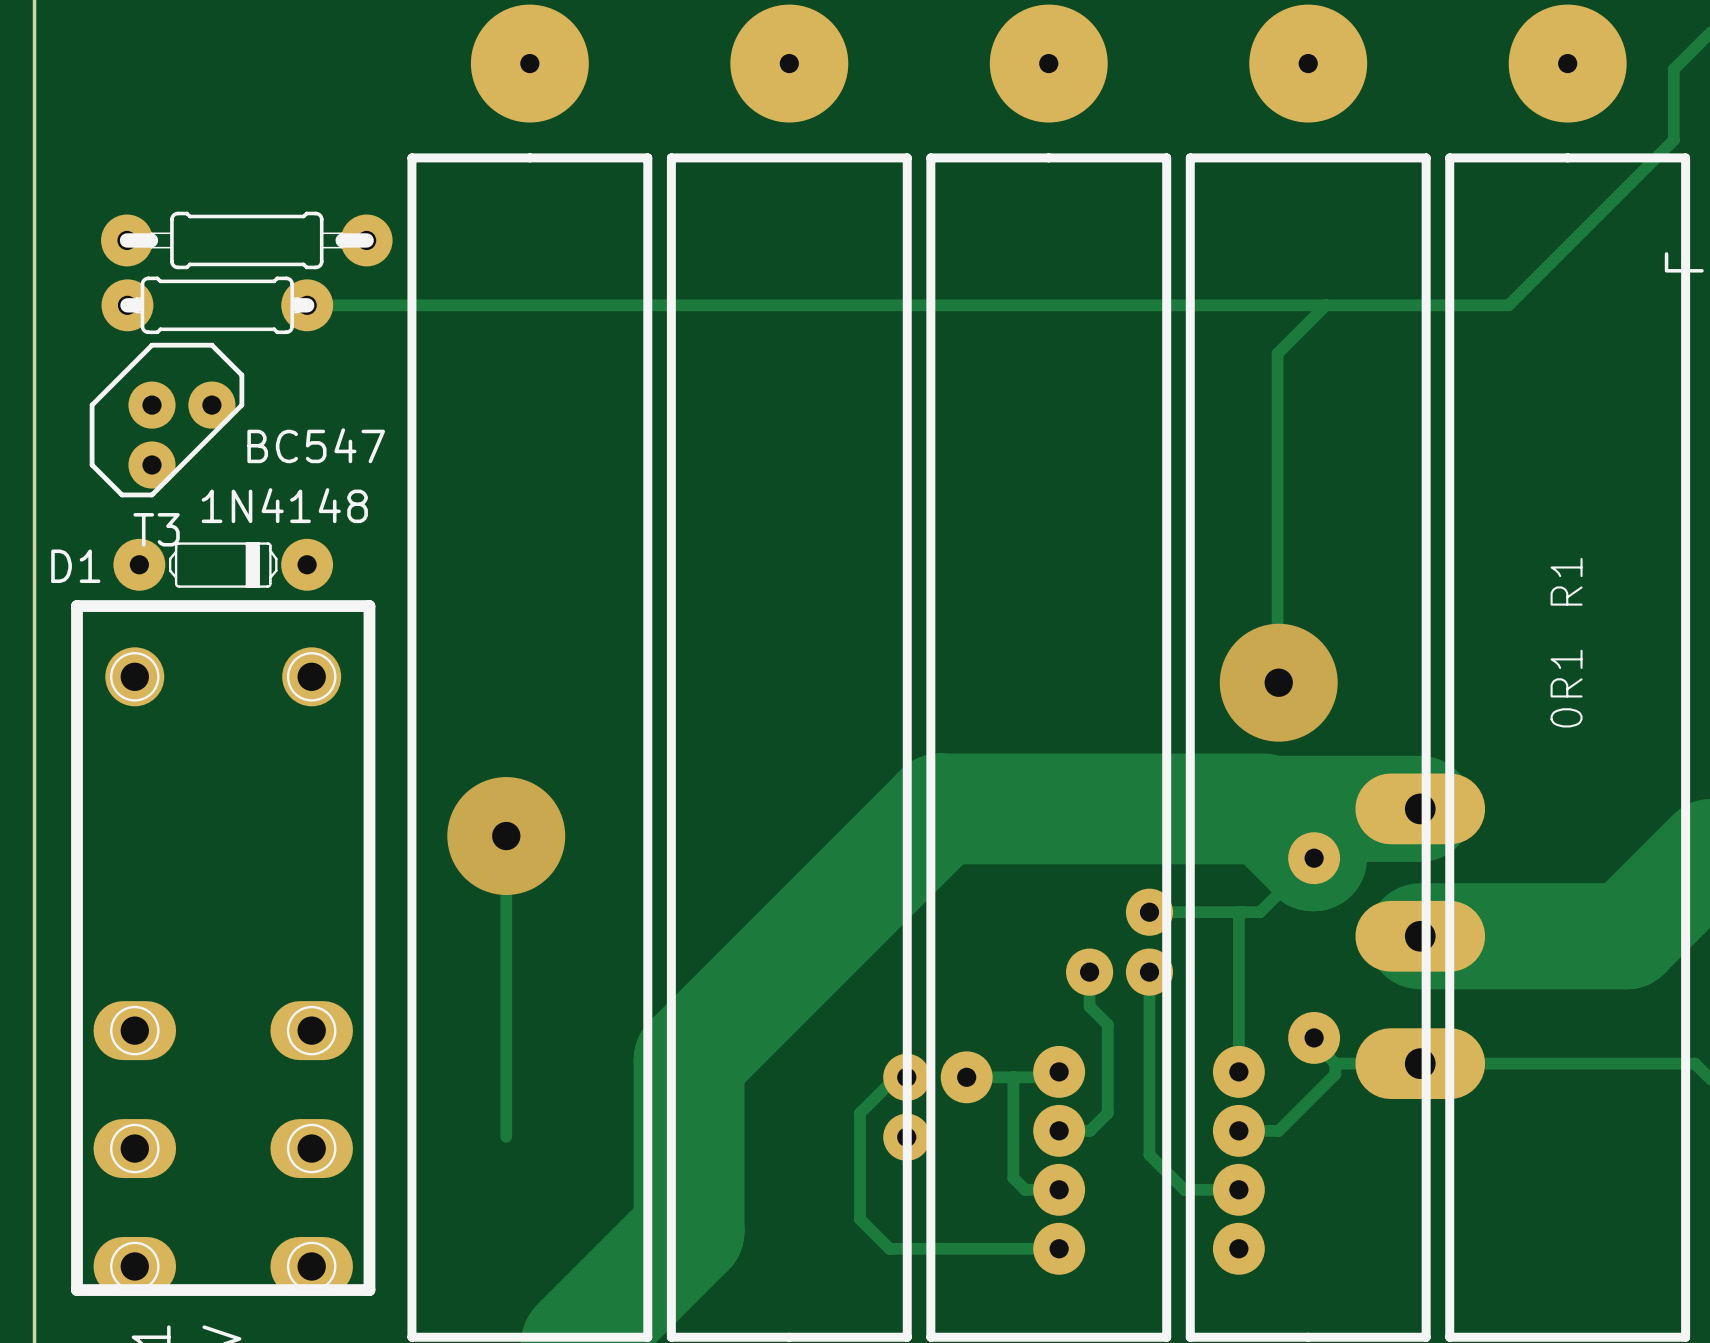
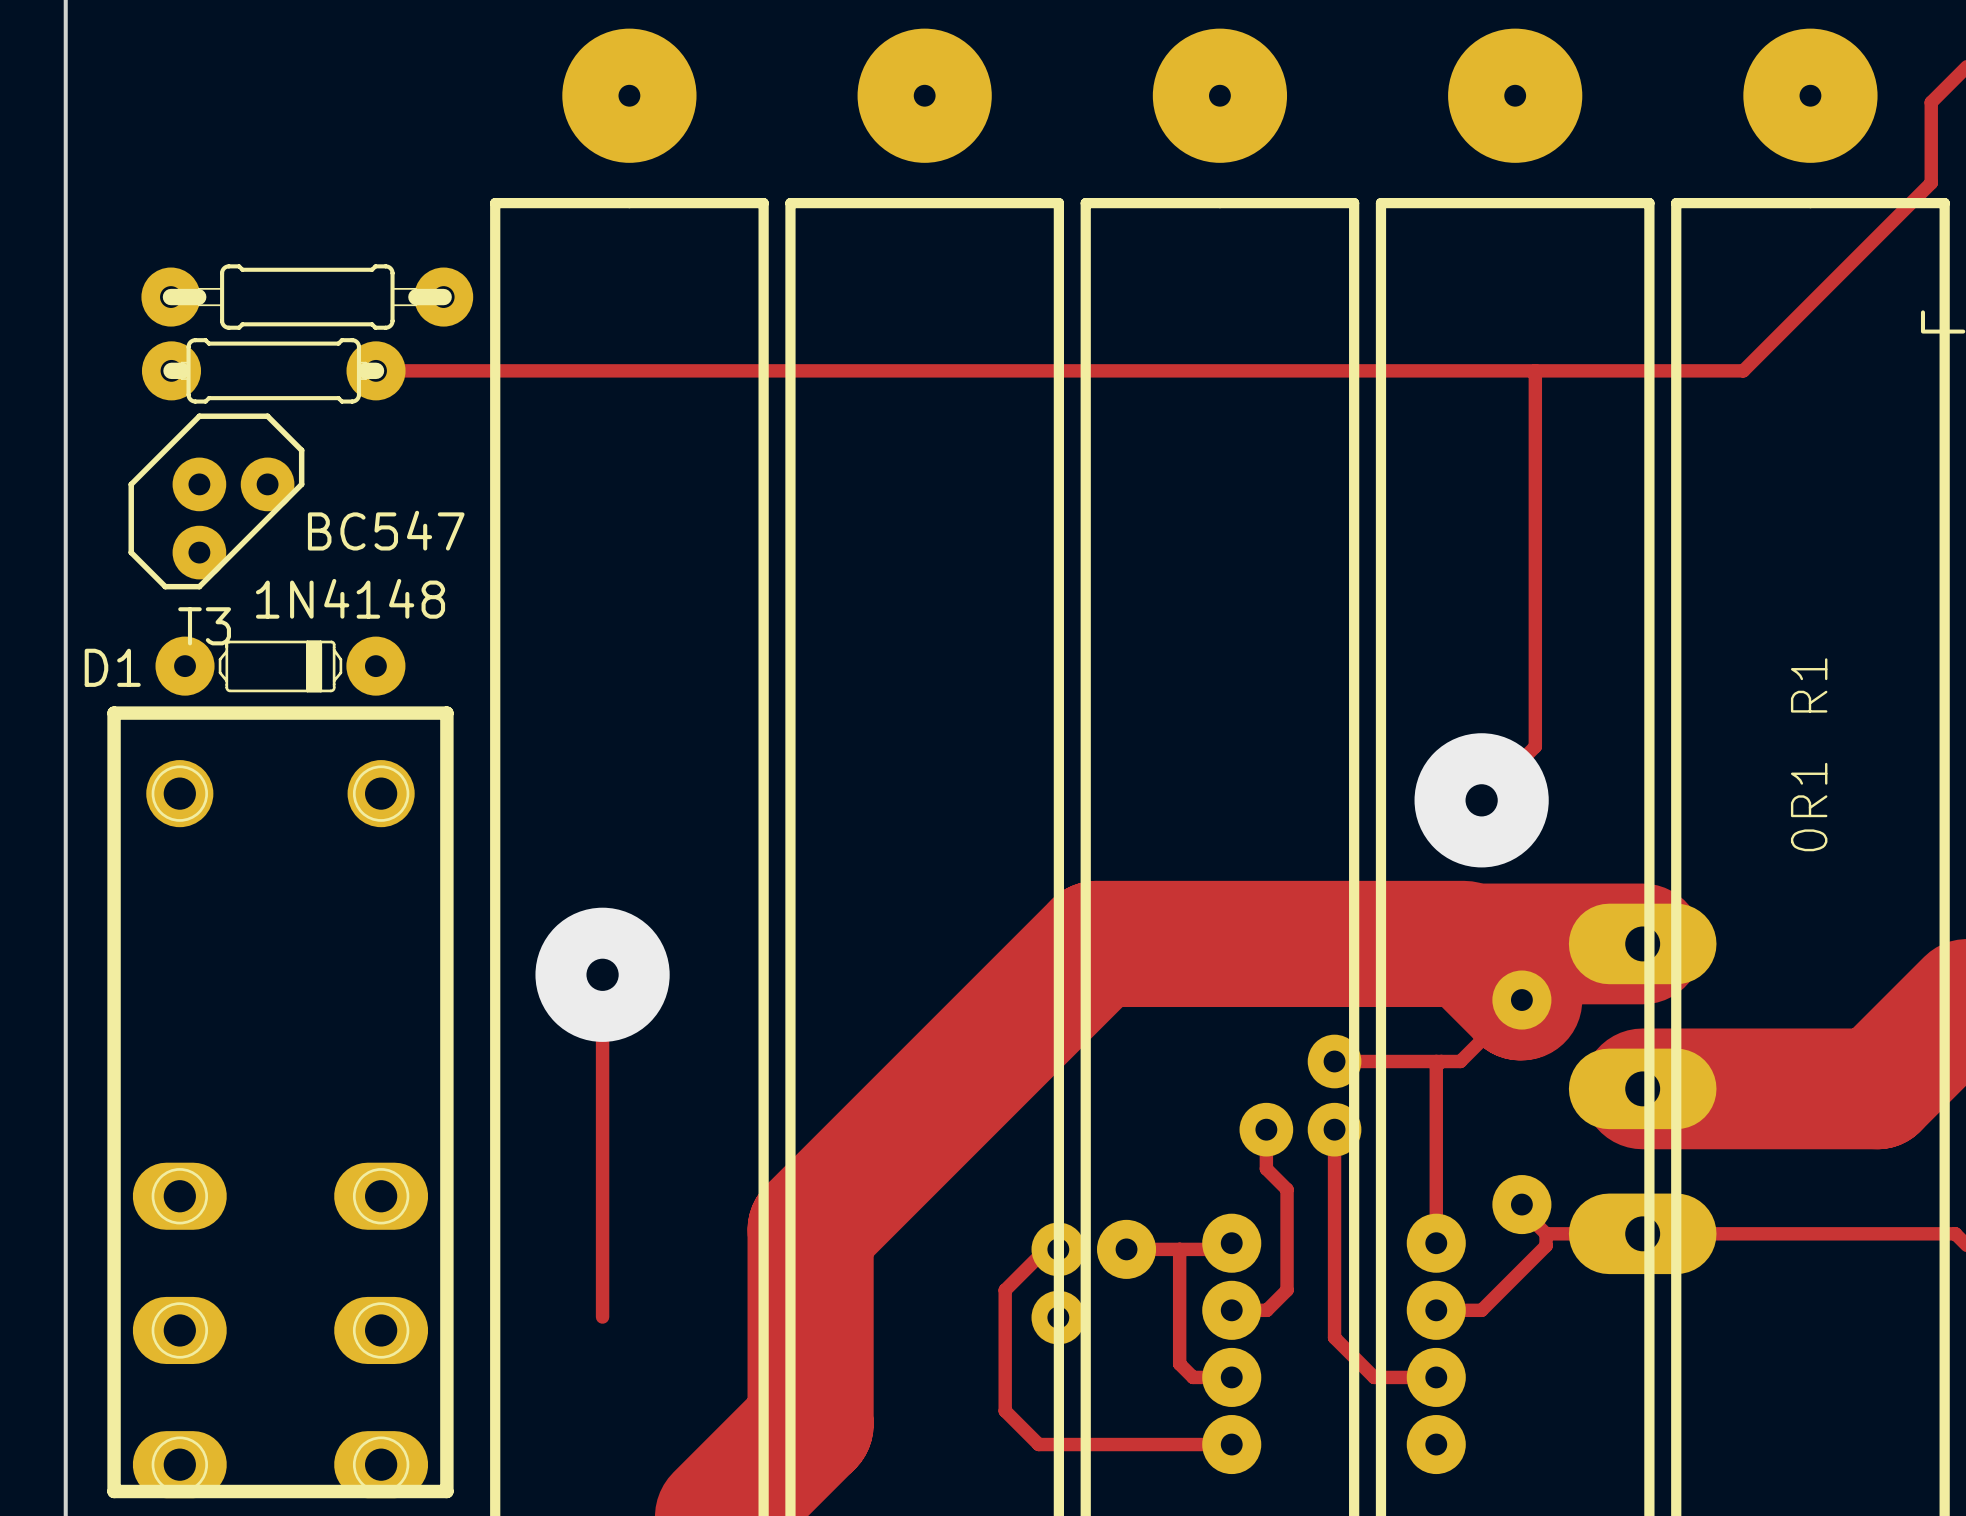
track: (1325, 305) (1277, 353) (1278, 682) -> (1535, 370) (1535, 746) (1481, 800)

